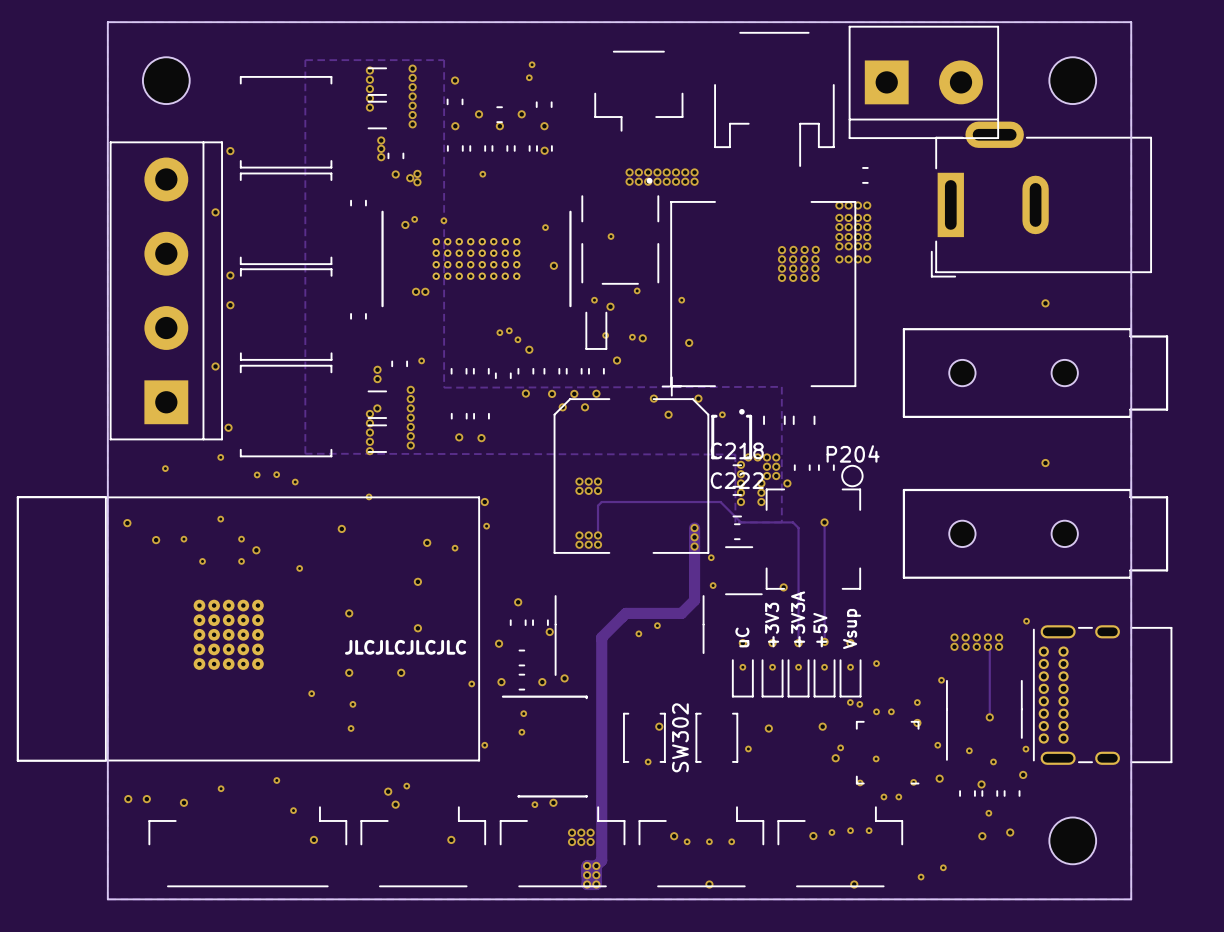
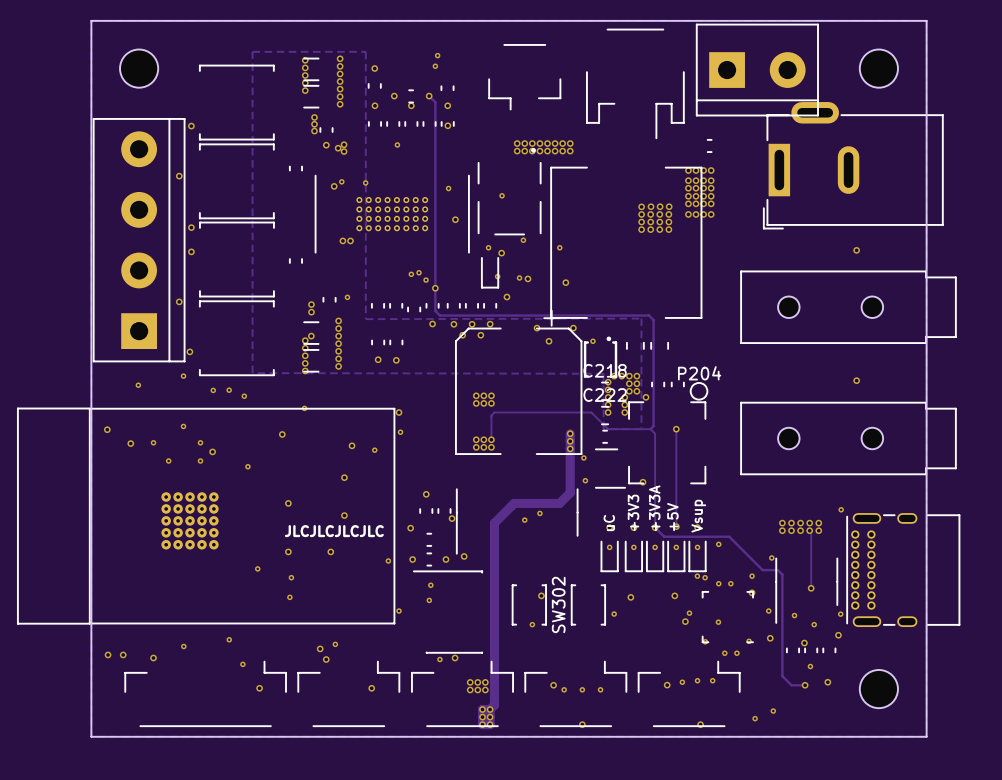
track: none -> (429, 96) (435, 102) (435, 310) (439, 315) (649, 315) (653, 320) (653, 426) (650, 429)
track: none -> (655, 527) (664, 536) (729, 536) (762, 570) (777, 570) (782, 574) (782, 676) (791, 685) (805, 685)

